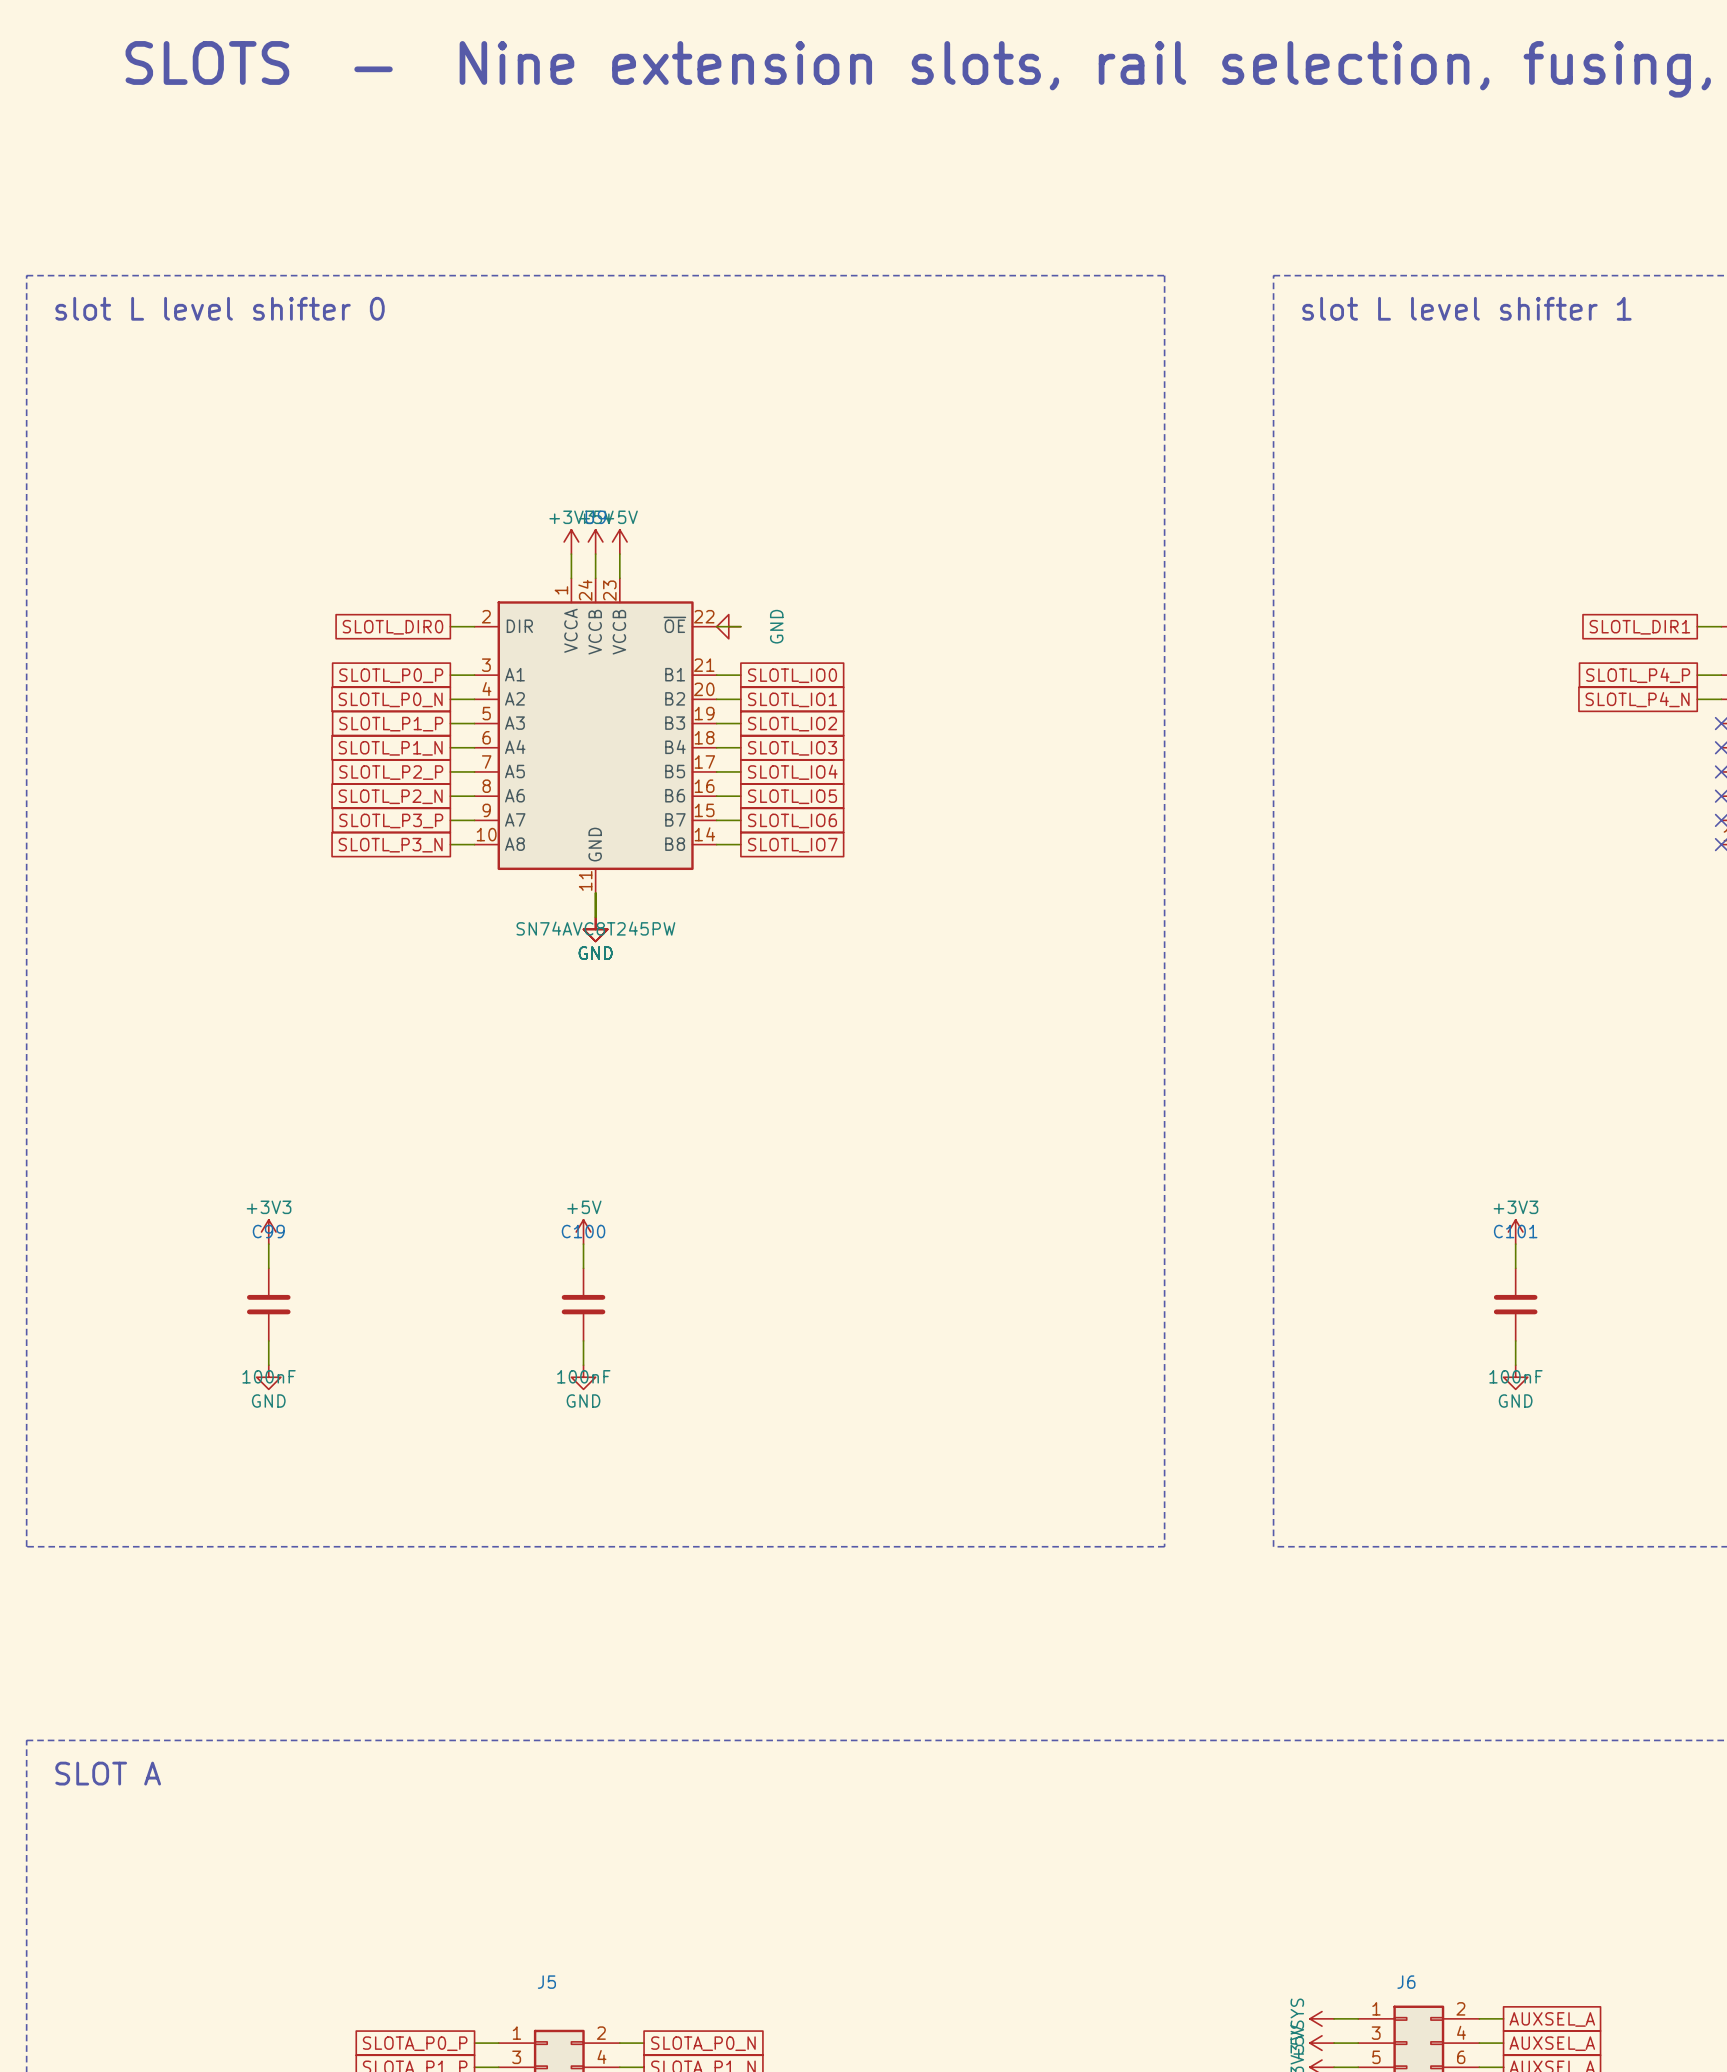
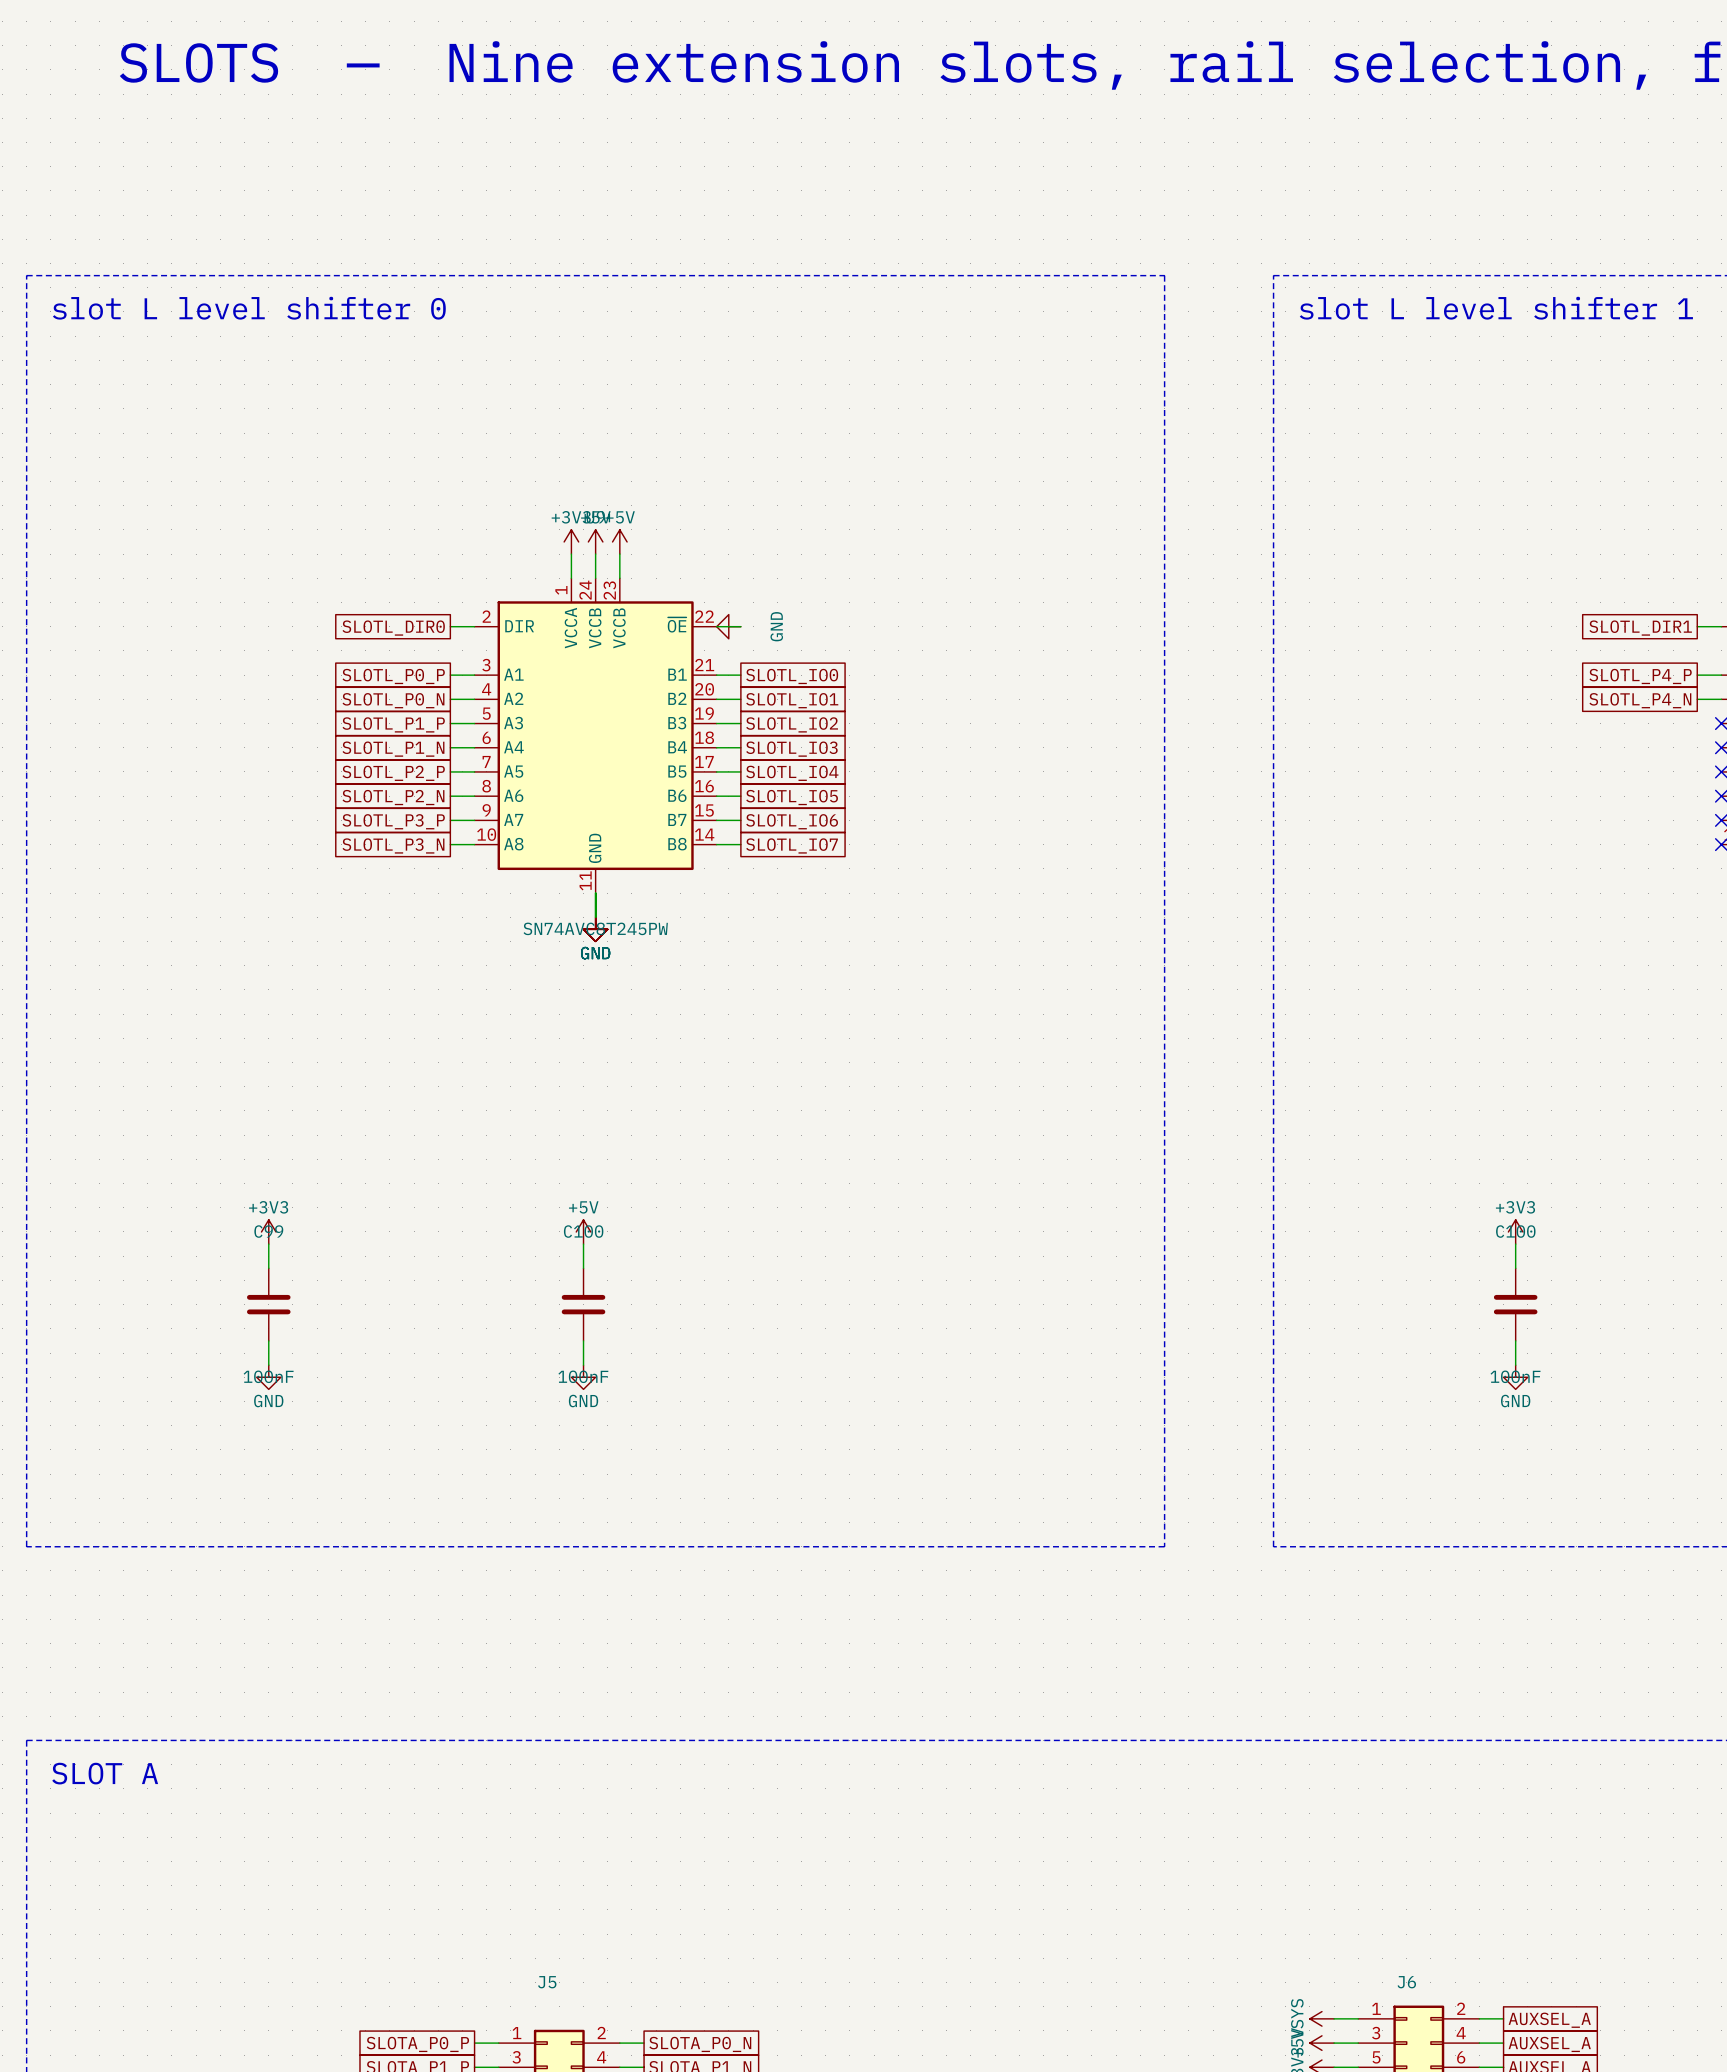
C101 name: C101 (1515, 1231) -> C100 (1515, 1231)

